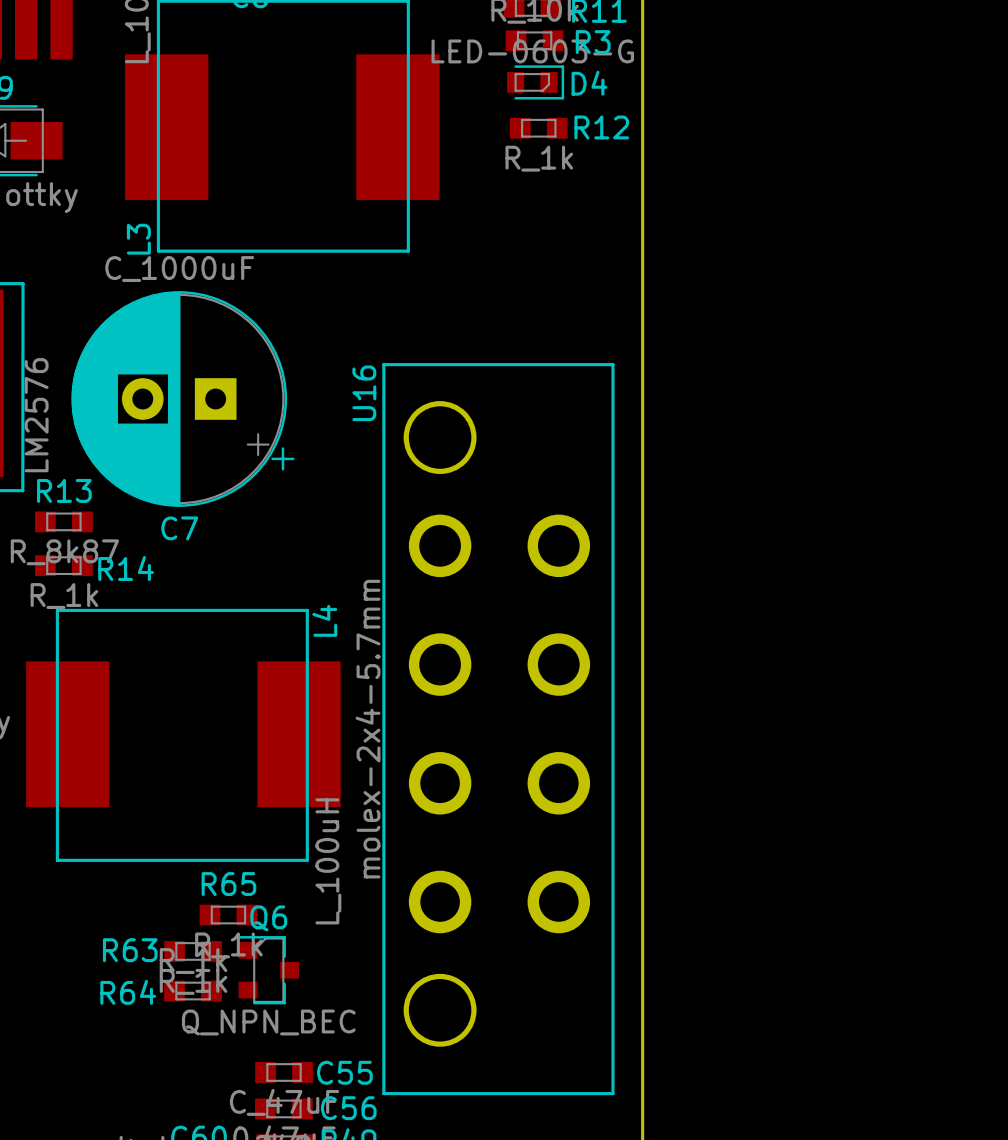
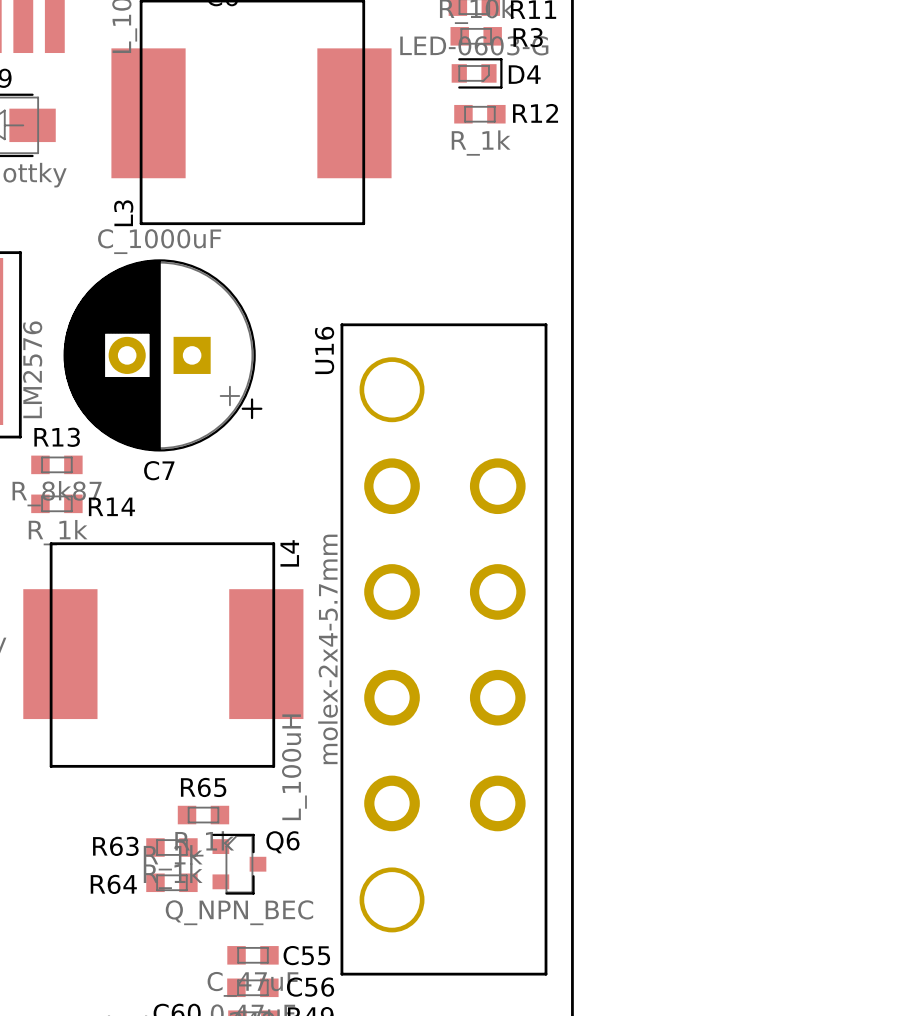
Q6 name position: Q6 (268, 918) -> Q6 (282, 842)

